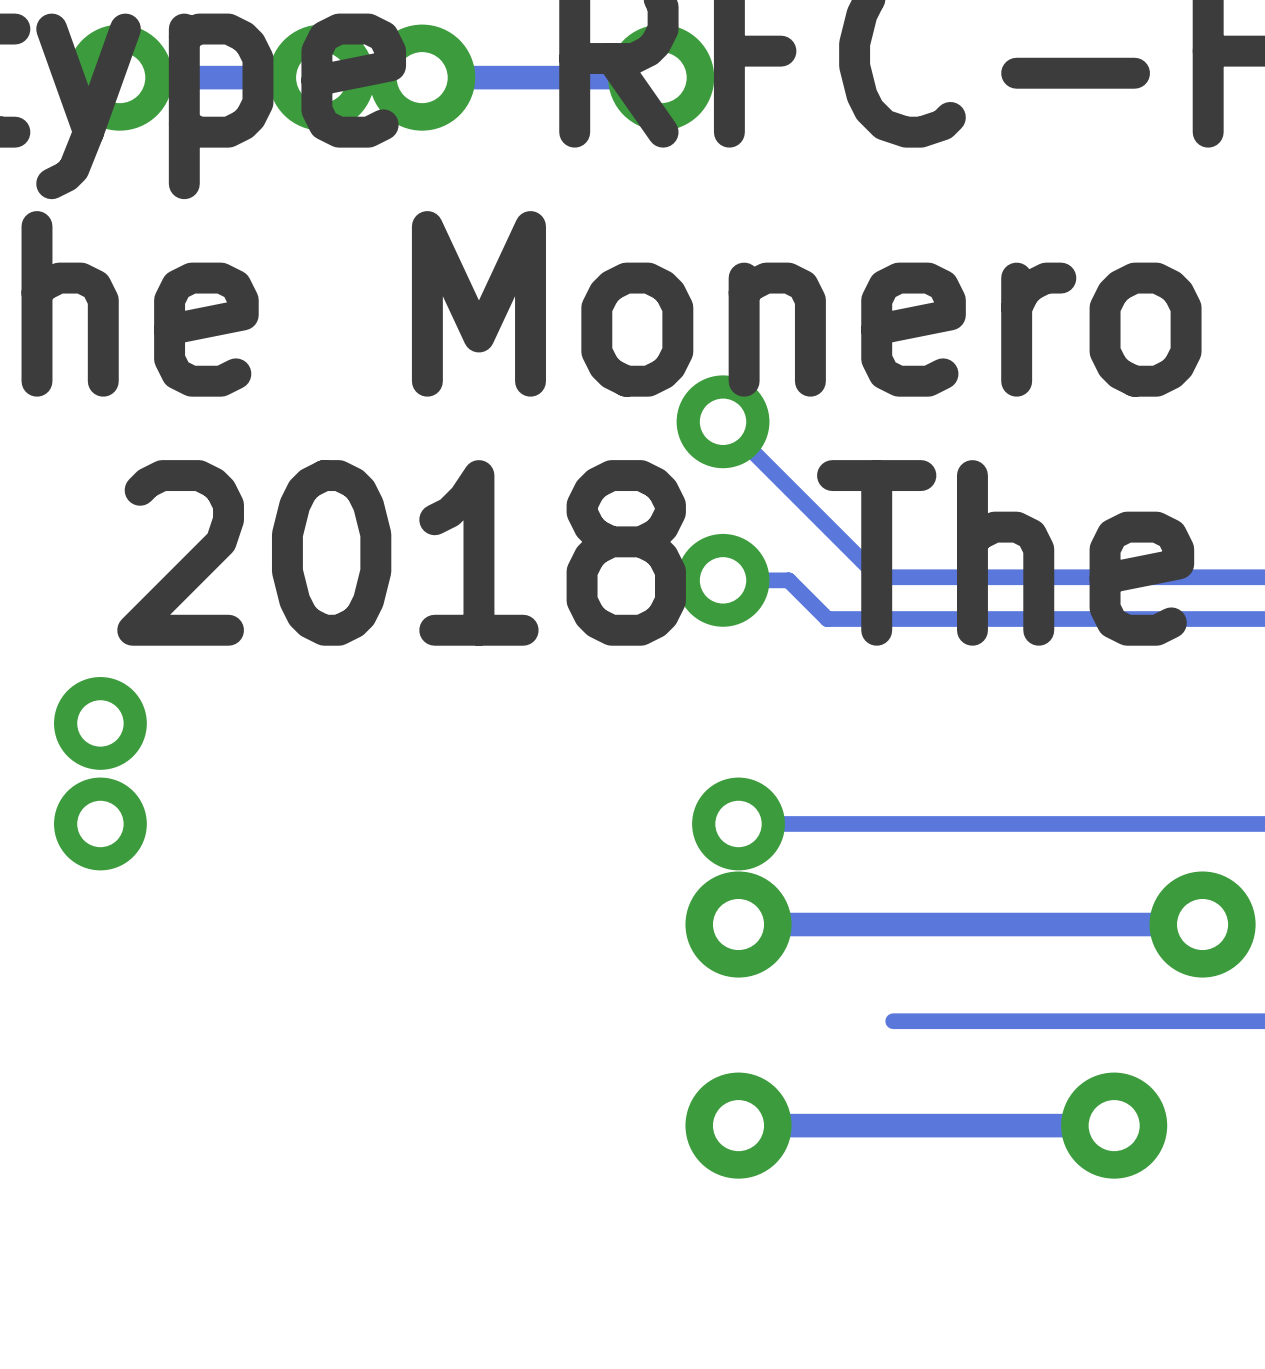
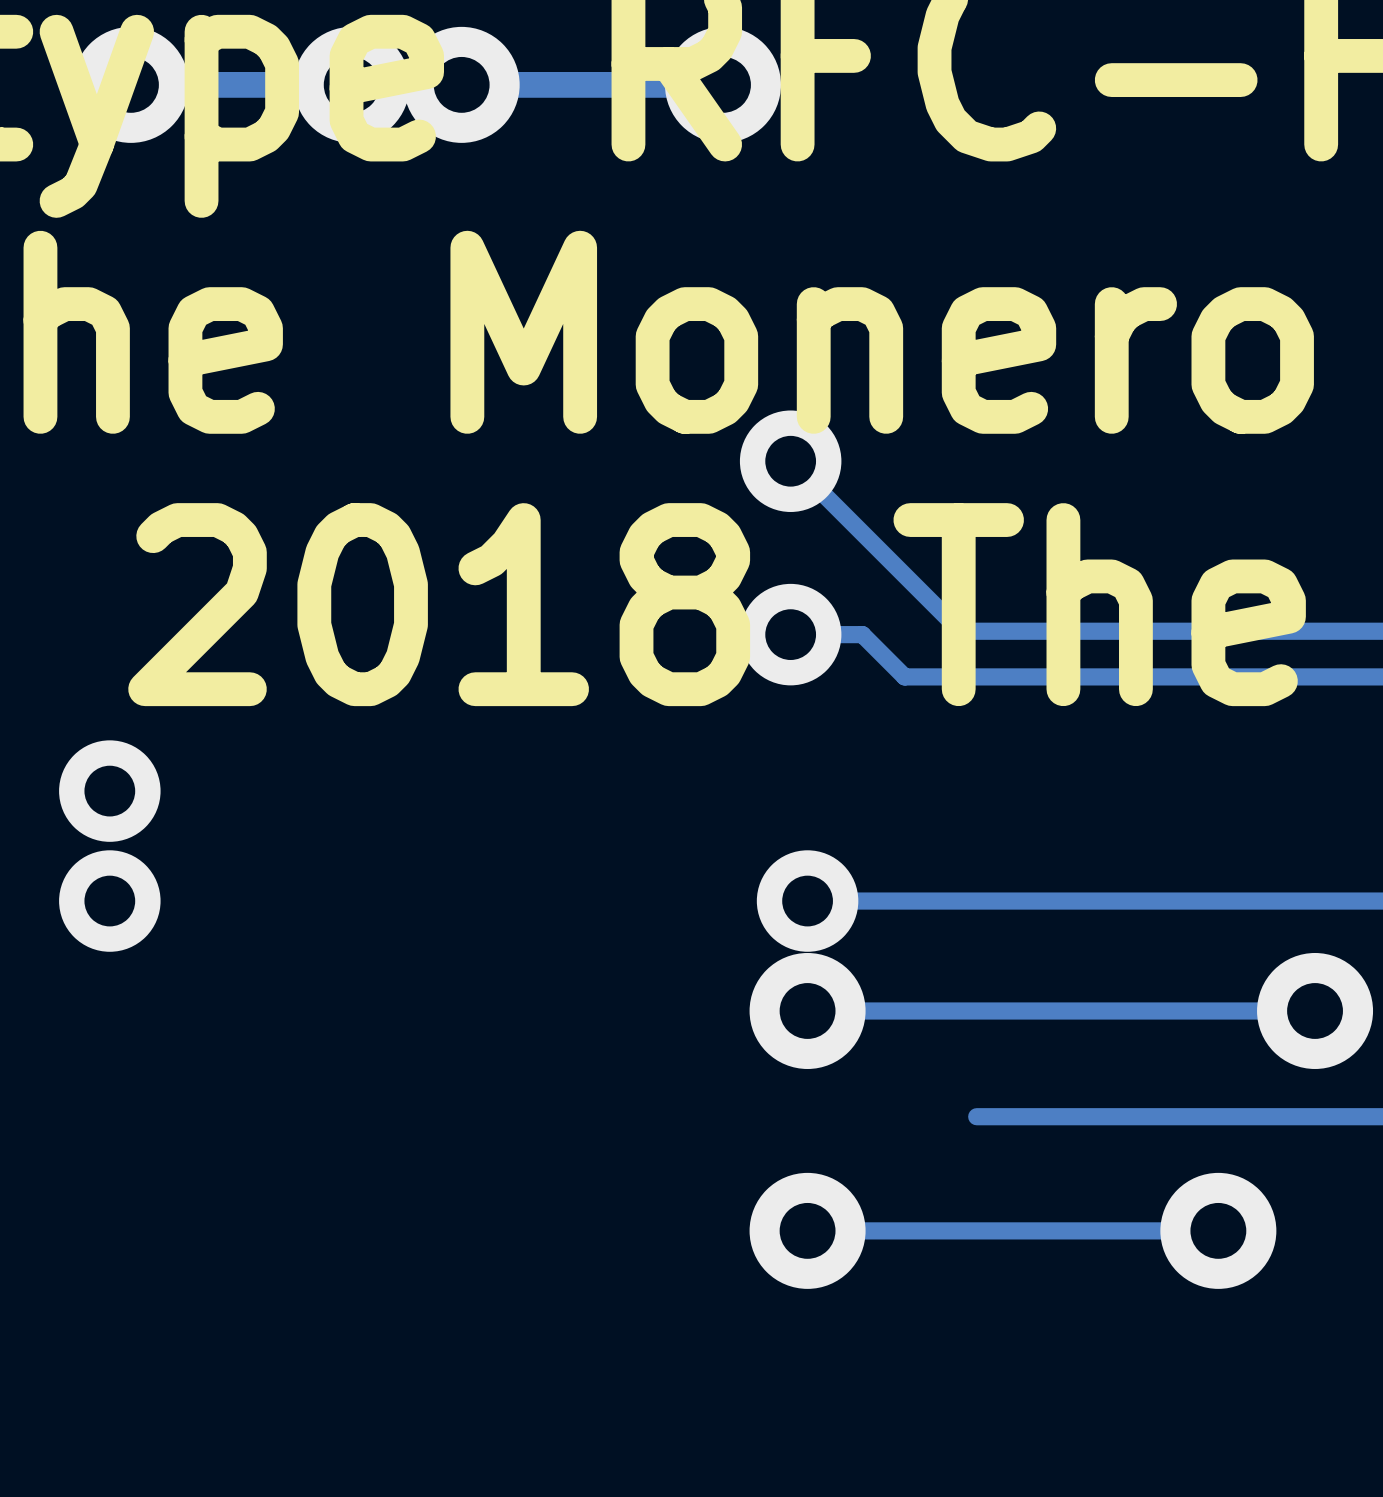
track width: thick (1202, 924) (738, 924) -> thin (1315, 1010) (807, 1010)
track width: thick (1114, 1125) (738, 1125) -> thin (1218, 1230) (807, 1230)

